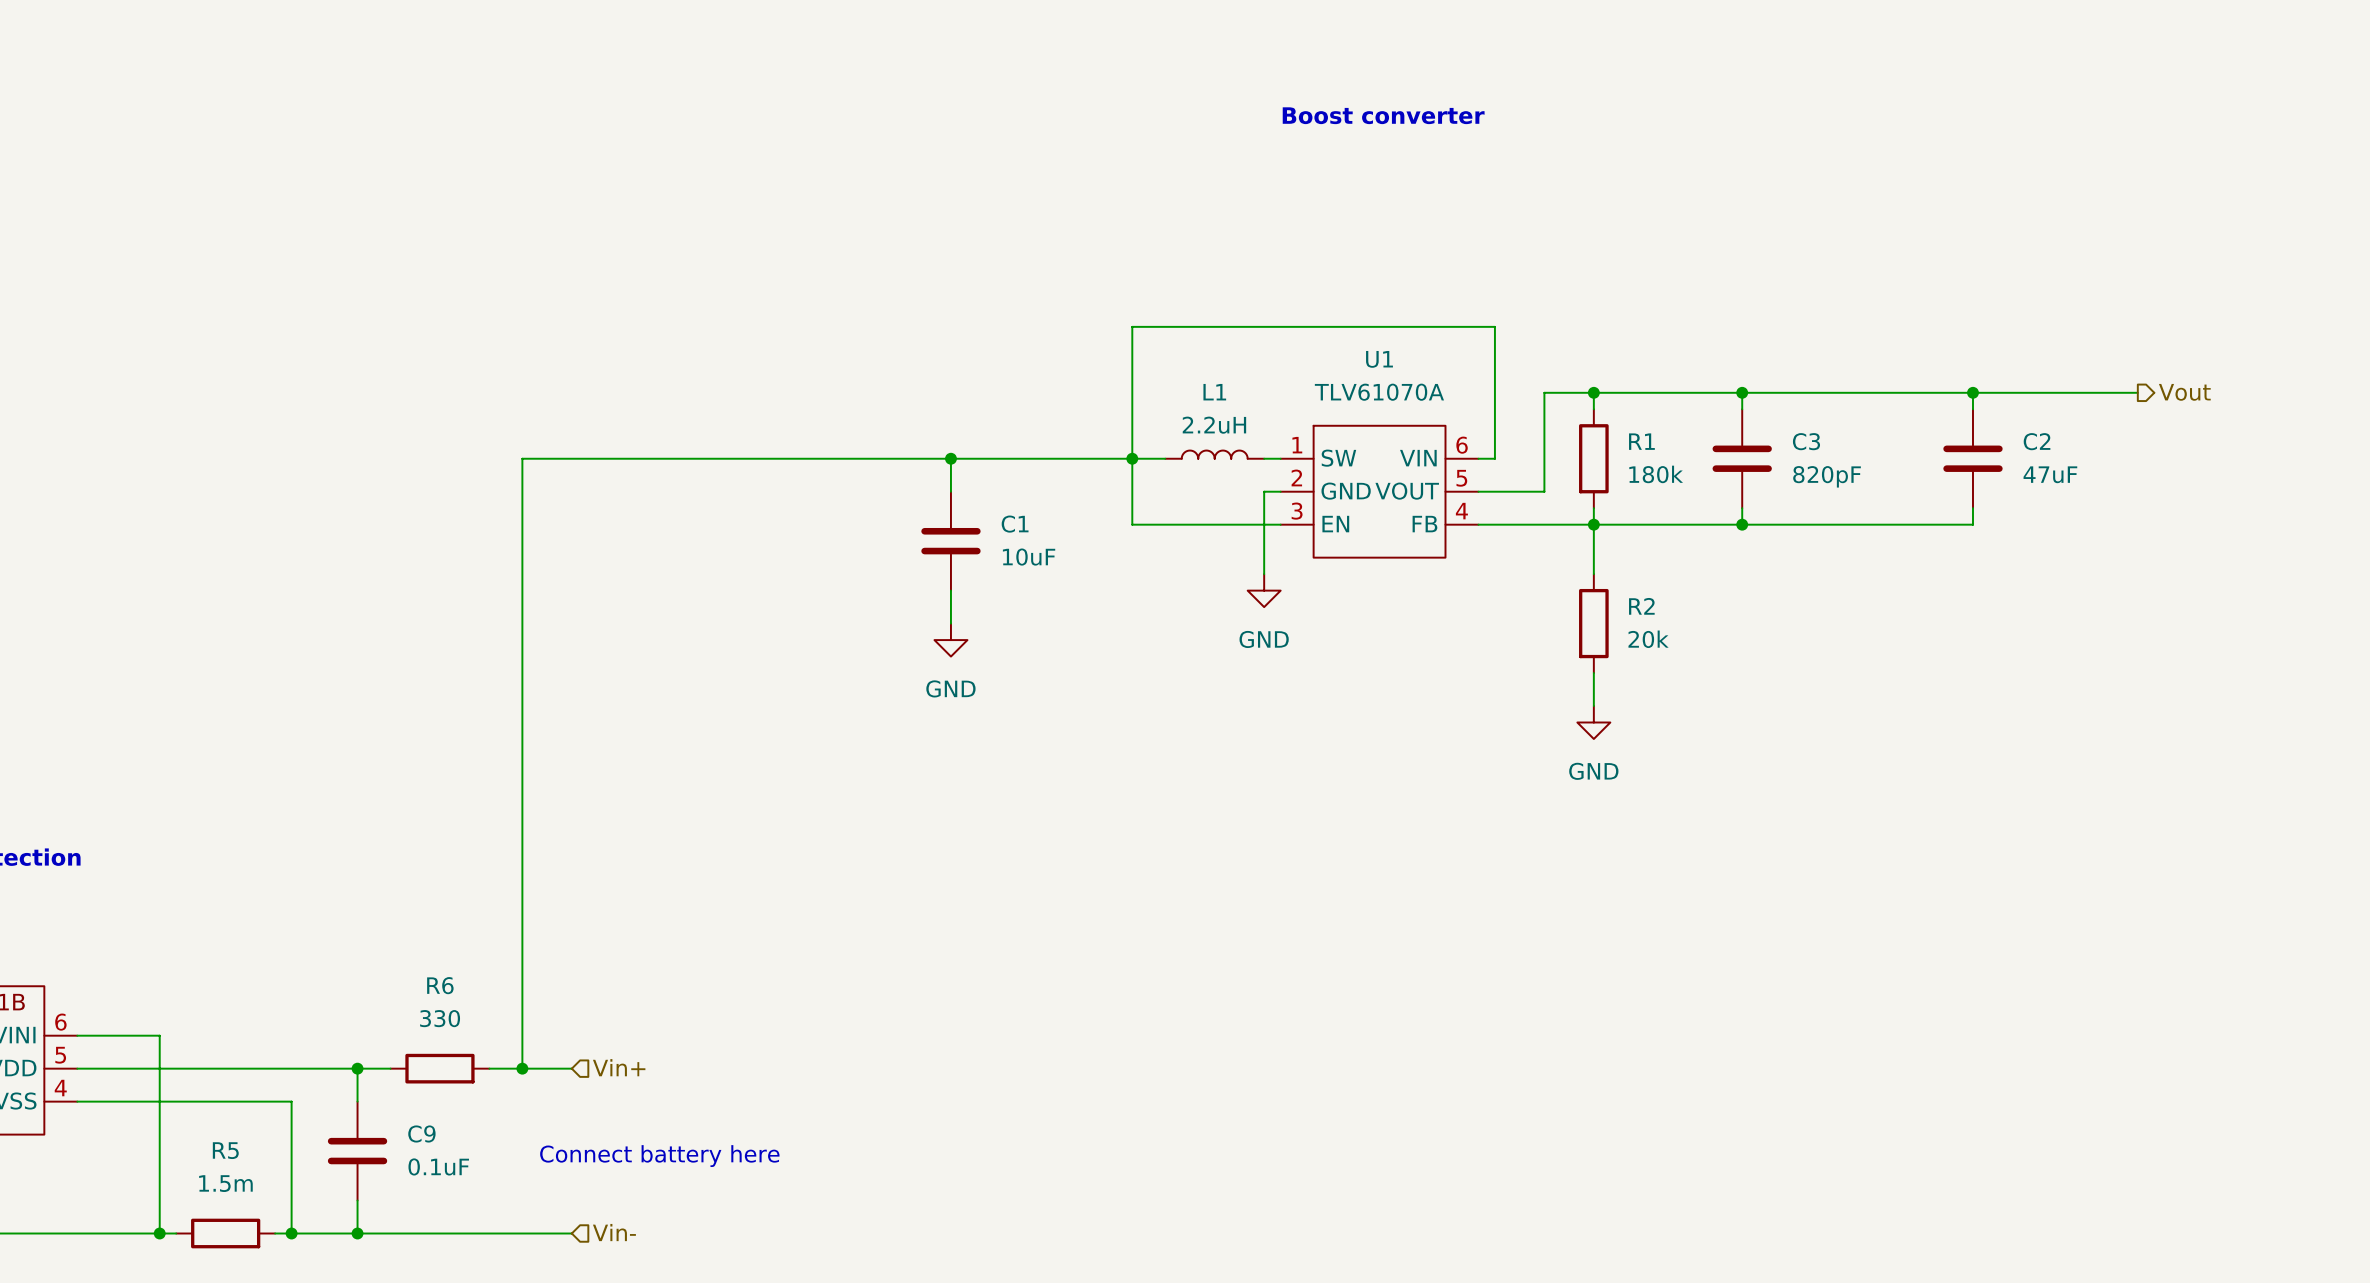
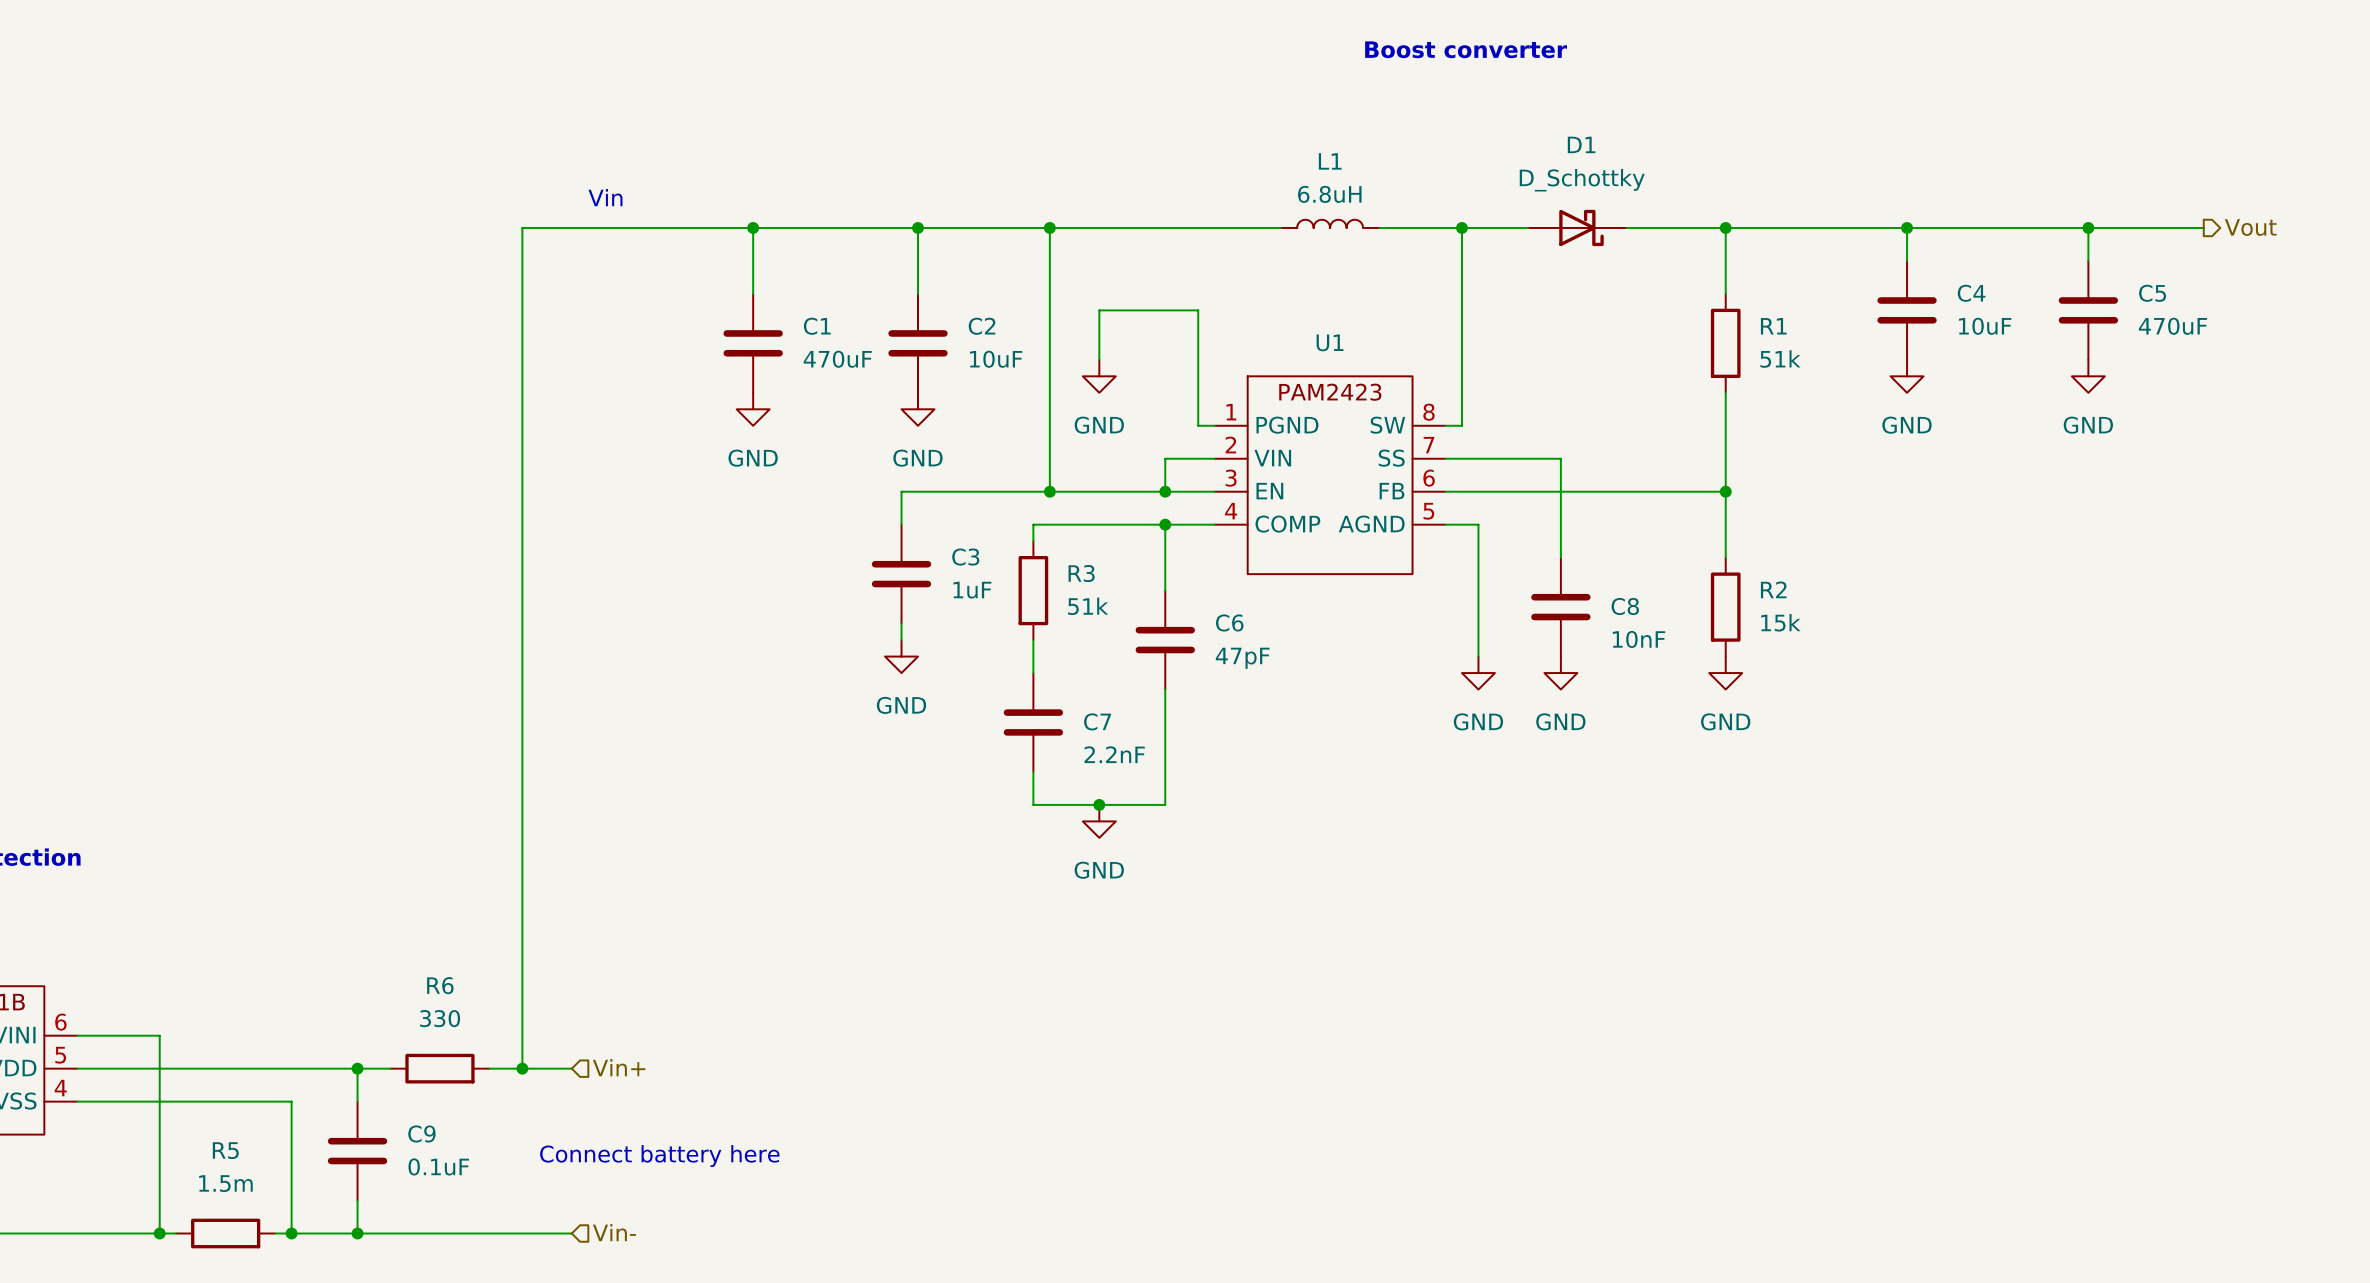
text position: Boost converter (1383, 115) -> Boost converter (1466, 49)
text: none -> Vin (605, 197)
wire: none -> (753, 227) (753, 293)
junction: none -> (753, 227)
wire: none -> (918, 227) (918, 293)
junction: none -> (918, 227)
wire: none -> (1049, 227) (1049, 491)
junction: none -> (1049, 227)
wire: none -> (1379, 227) (1527, 227)
wire: none -> (1461, 227) (1461, 425) (1445, 425)
junction: none -> (1461, 227)
D1: none -> D_Schottky (1577, 227)
wire: none -> (1626, 227) (2203, 227)
junction: none -> (1725, 227)
wire: none -> (1907, 227) (1907, 260)
junction: none -> (1907, 227)
wire: none -> (2088, 227) (2088, 260)
junction: none -> (2088, 227)
C4: none -> 10uF (1907, 310)
C5: none -> 470uF (2088, 310)
wire: none -> (1099, 359) (1099, 310) (1198, 310) (1198, 425) (1214, 425)
power symbol: none -> GND (1099, 376)
power symbol: none -> GND (1907, 376)
power symbol: none -> GND (2088, 376)
U1 value: TLV61070A (1379, 392) -> none
wire: (1593, 392) (1593, 409) -> none
junction: (1593, 392) -> none
wire: none -> (1725, 392) (1725, 557)
wire: (1742, 392) (1742, 409) -> none
junction: (1742, 392) -> none
wire: (1972, 392) (1972, 409) -> none
junction: (1972, 392) -> none
wire: (2137, 392) (1544, 392) (1544, 491) -> (1725, 491) (1544, 491)
hierarchical label position: Vout (2184, 392) -> Vout (2250, 227)
power symbol: none -> GND (753, 409)
power symbol: none -> GND (918, 409)
L1 value: 2.2uH (1214, 425) -> 6.8uH (1329, 194)
U1 symbol: [1280, 425, 1479, 558] -> [1214, 376, 1446, 575]
L1 position: (1214, 454) -> (1330, 223)
wire: (522, 458) (1165, 458) -> (522, 458) (522, 227) (1280, 227)
wire: (950, 458) (950, 491) -> none
junction: (950, 458) -> none
junction: (1132, 458) -> none
wire: none -> (1214, 458) (1165, 458) (1165, 491)
wire: (1264, 458) (1280, 458) -> none
wire: (1494, 458) (1494, 326) (1132, 326) (1132, 524) -> (1494, 458) (1560, 458) (1560, 557)
R1 position: (1593, 458) -> (1725, 343)
C3 position: (1742, 458) -> (901, 574)
C2 position: (1972, 458) -> (918, 343)
R1 value: 180k (1656, 474) -> 51k (1780, 359)
C2 value: 47uF (2050, 474) -> 10uF (996, 359)
C3 value: 820pF (1827, 476) -> 1uF (972, 590)
junction: none -> (1049, 491)
junction: none -> (1165, 491)
wire: none -> (1214, 491) (901, 491) (901, 524)
wire: (1280, 491) (1264, 491) (1264, 574) -> none
wire: (1593, 508) (1593, 574) -> (1725, 227) (1725, 293)
wire: (1742, 508) (1742, 524) -> none
wire: (1972, 508) (1972, 524) (1478, 524) -> none
wire: none -> (1132, 524) (1033, 524) (1033, 541)
wire: none -> (1165, 524) (1165, 590)
junction: none -> (1165, 524)
wire: none -> (1445, 524) (1478, 524) (1478, 656)
junction: (1593, 524) -> none
junction position: (1742, 524) -> (1725, 491)
C1 position: (950, 541) -> (753, 343)
C1 value: 10uF (1029, 557) -> 470uF (837, 359)
wire: (950, 590) (950, 623) -> (1033, 640) (1033, 673)
R3: none -> 51k (1033, 590)
power symbol: GND (1264, 590) -> none
C8: none -> 10nF (1560, 607)
wire: none -> (901, 623) (901, 640)
R2 position: (1593, 623) -> (1725, 607)
R2 value: 20k (1648, 639) -> 15k (1780, 622)
power symbol position: GND (950, 640) -> GND (901, 656)
C6: none -> 47pF (1165, 640)
power symbol: none -> GND (1478, 673)
wire: (1593, 673) (1593, 706) -> none
power symbol: none -> GND (1725, 673)
wire: none -> (1165, 689) (1165, 804) (1033, 804) (1033, 771)
C7: none -> 2.2nF (1033, 722)
power symbol position: GND (1593, 722) -> GND (1560, 673)
junction: none -> (1099, 804)
power symbol: none -> GND (1099, 821)

